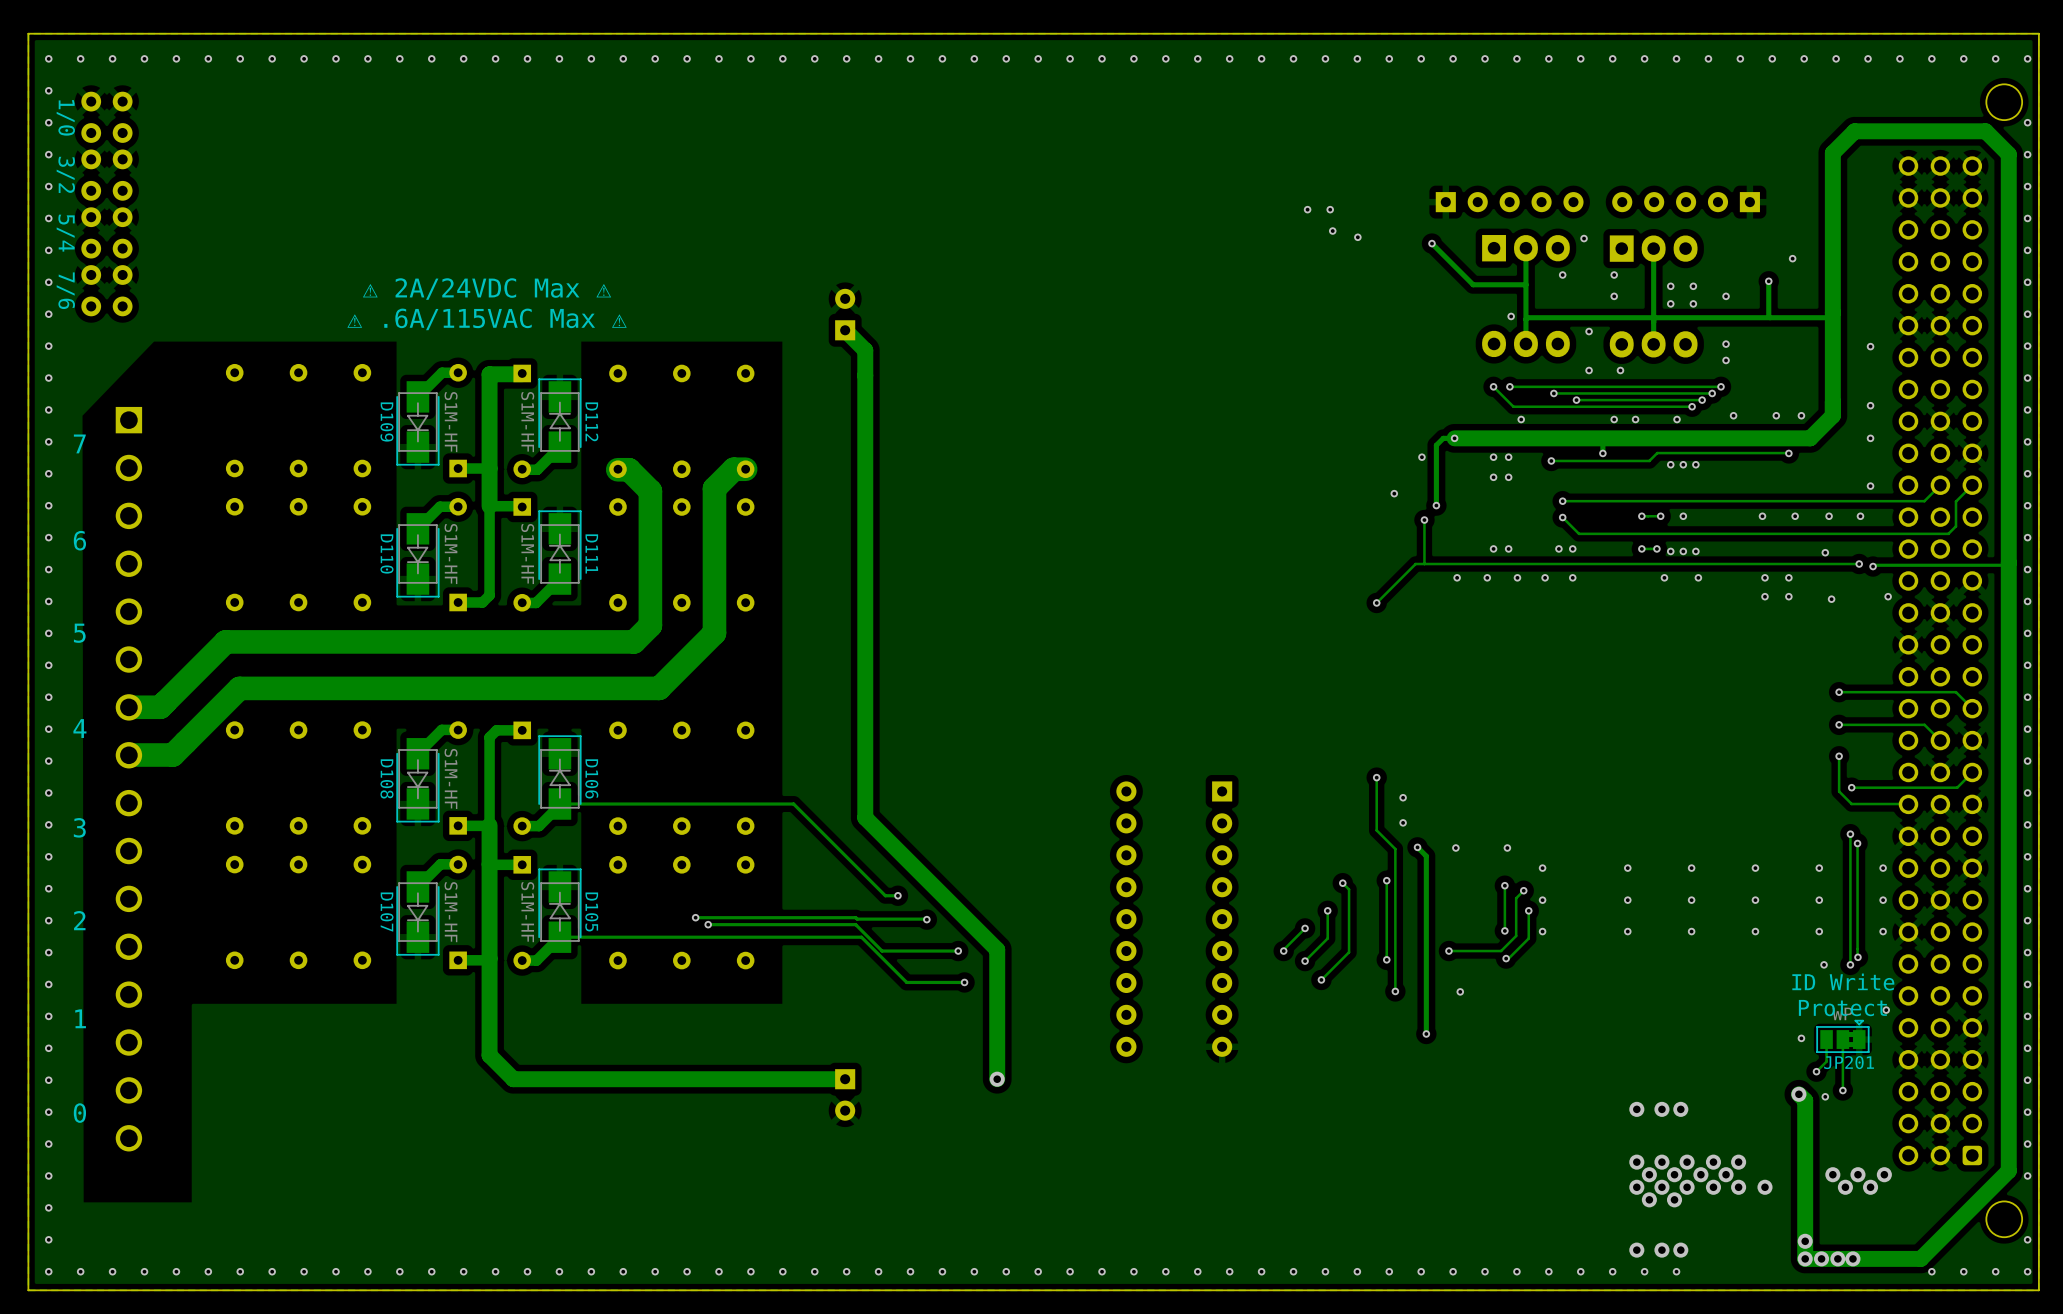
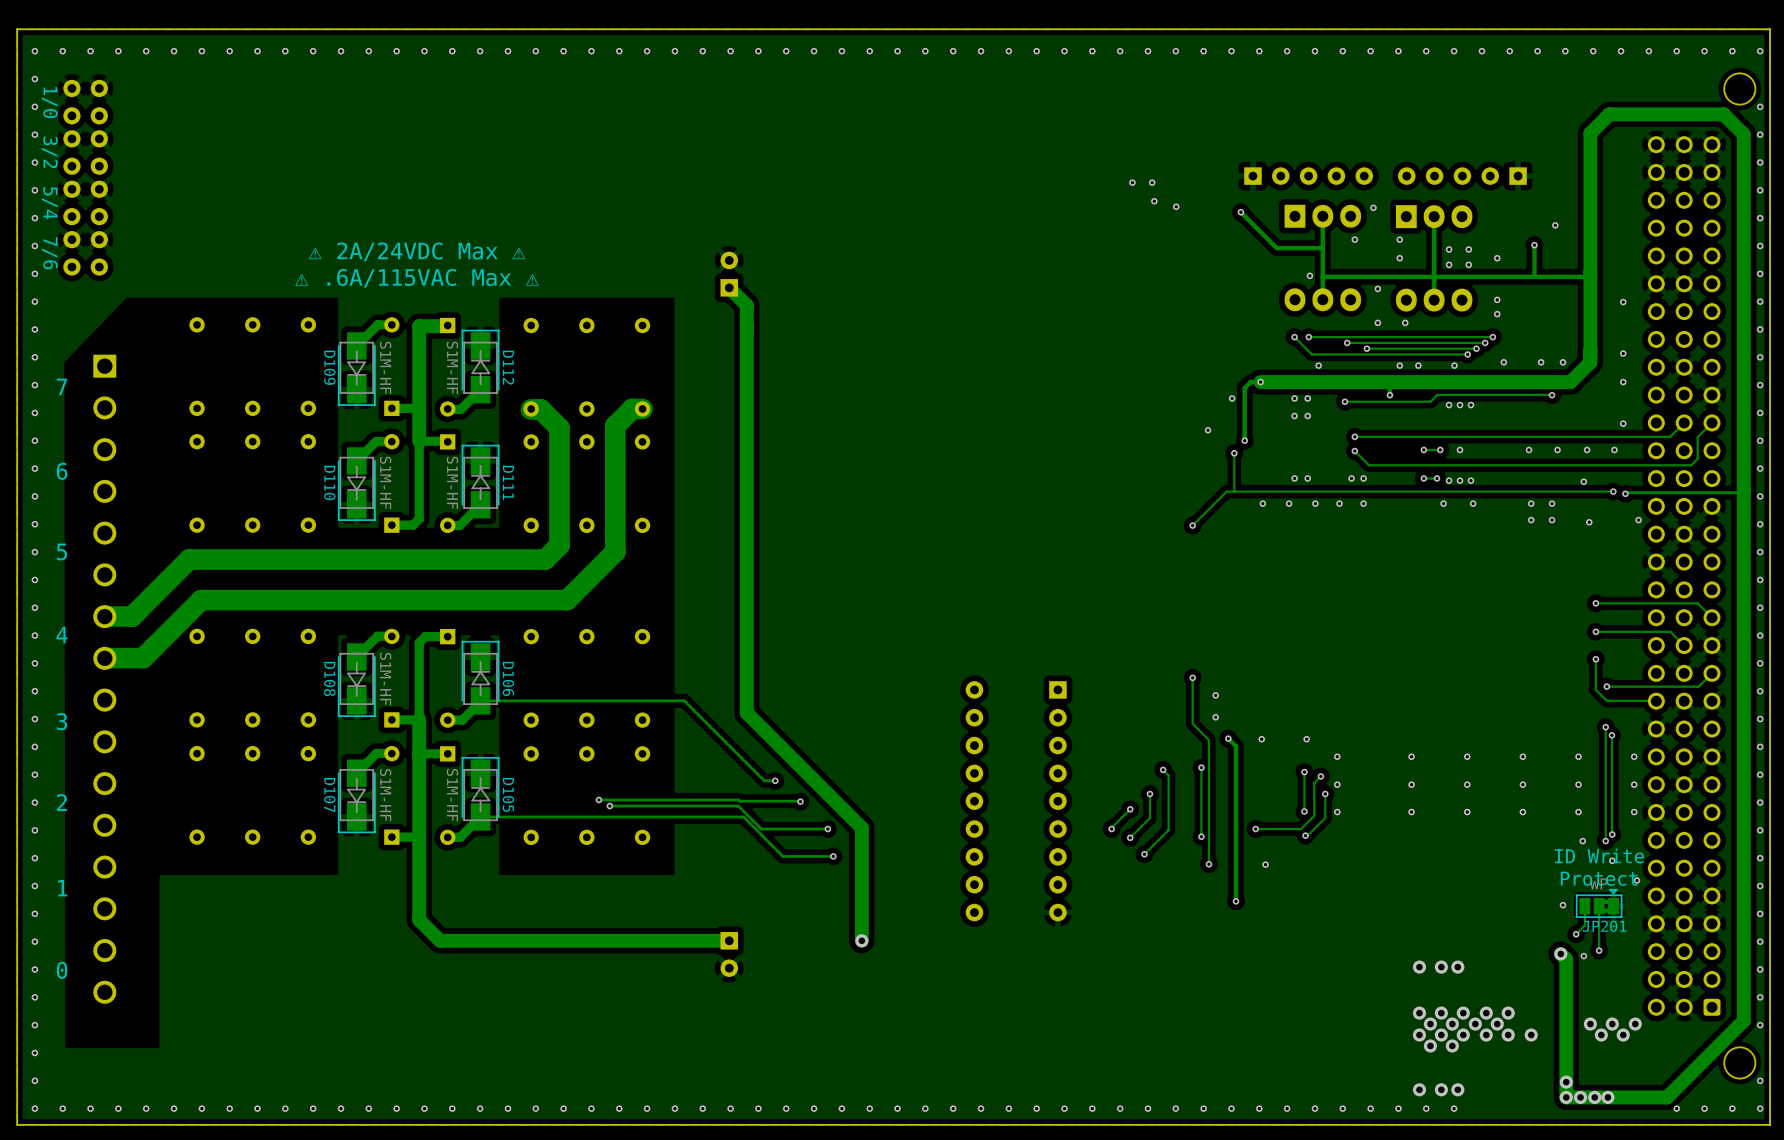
via: none -> (1612, 860)

